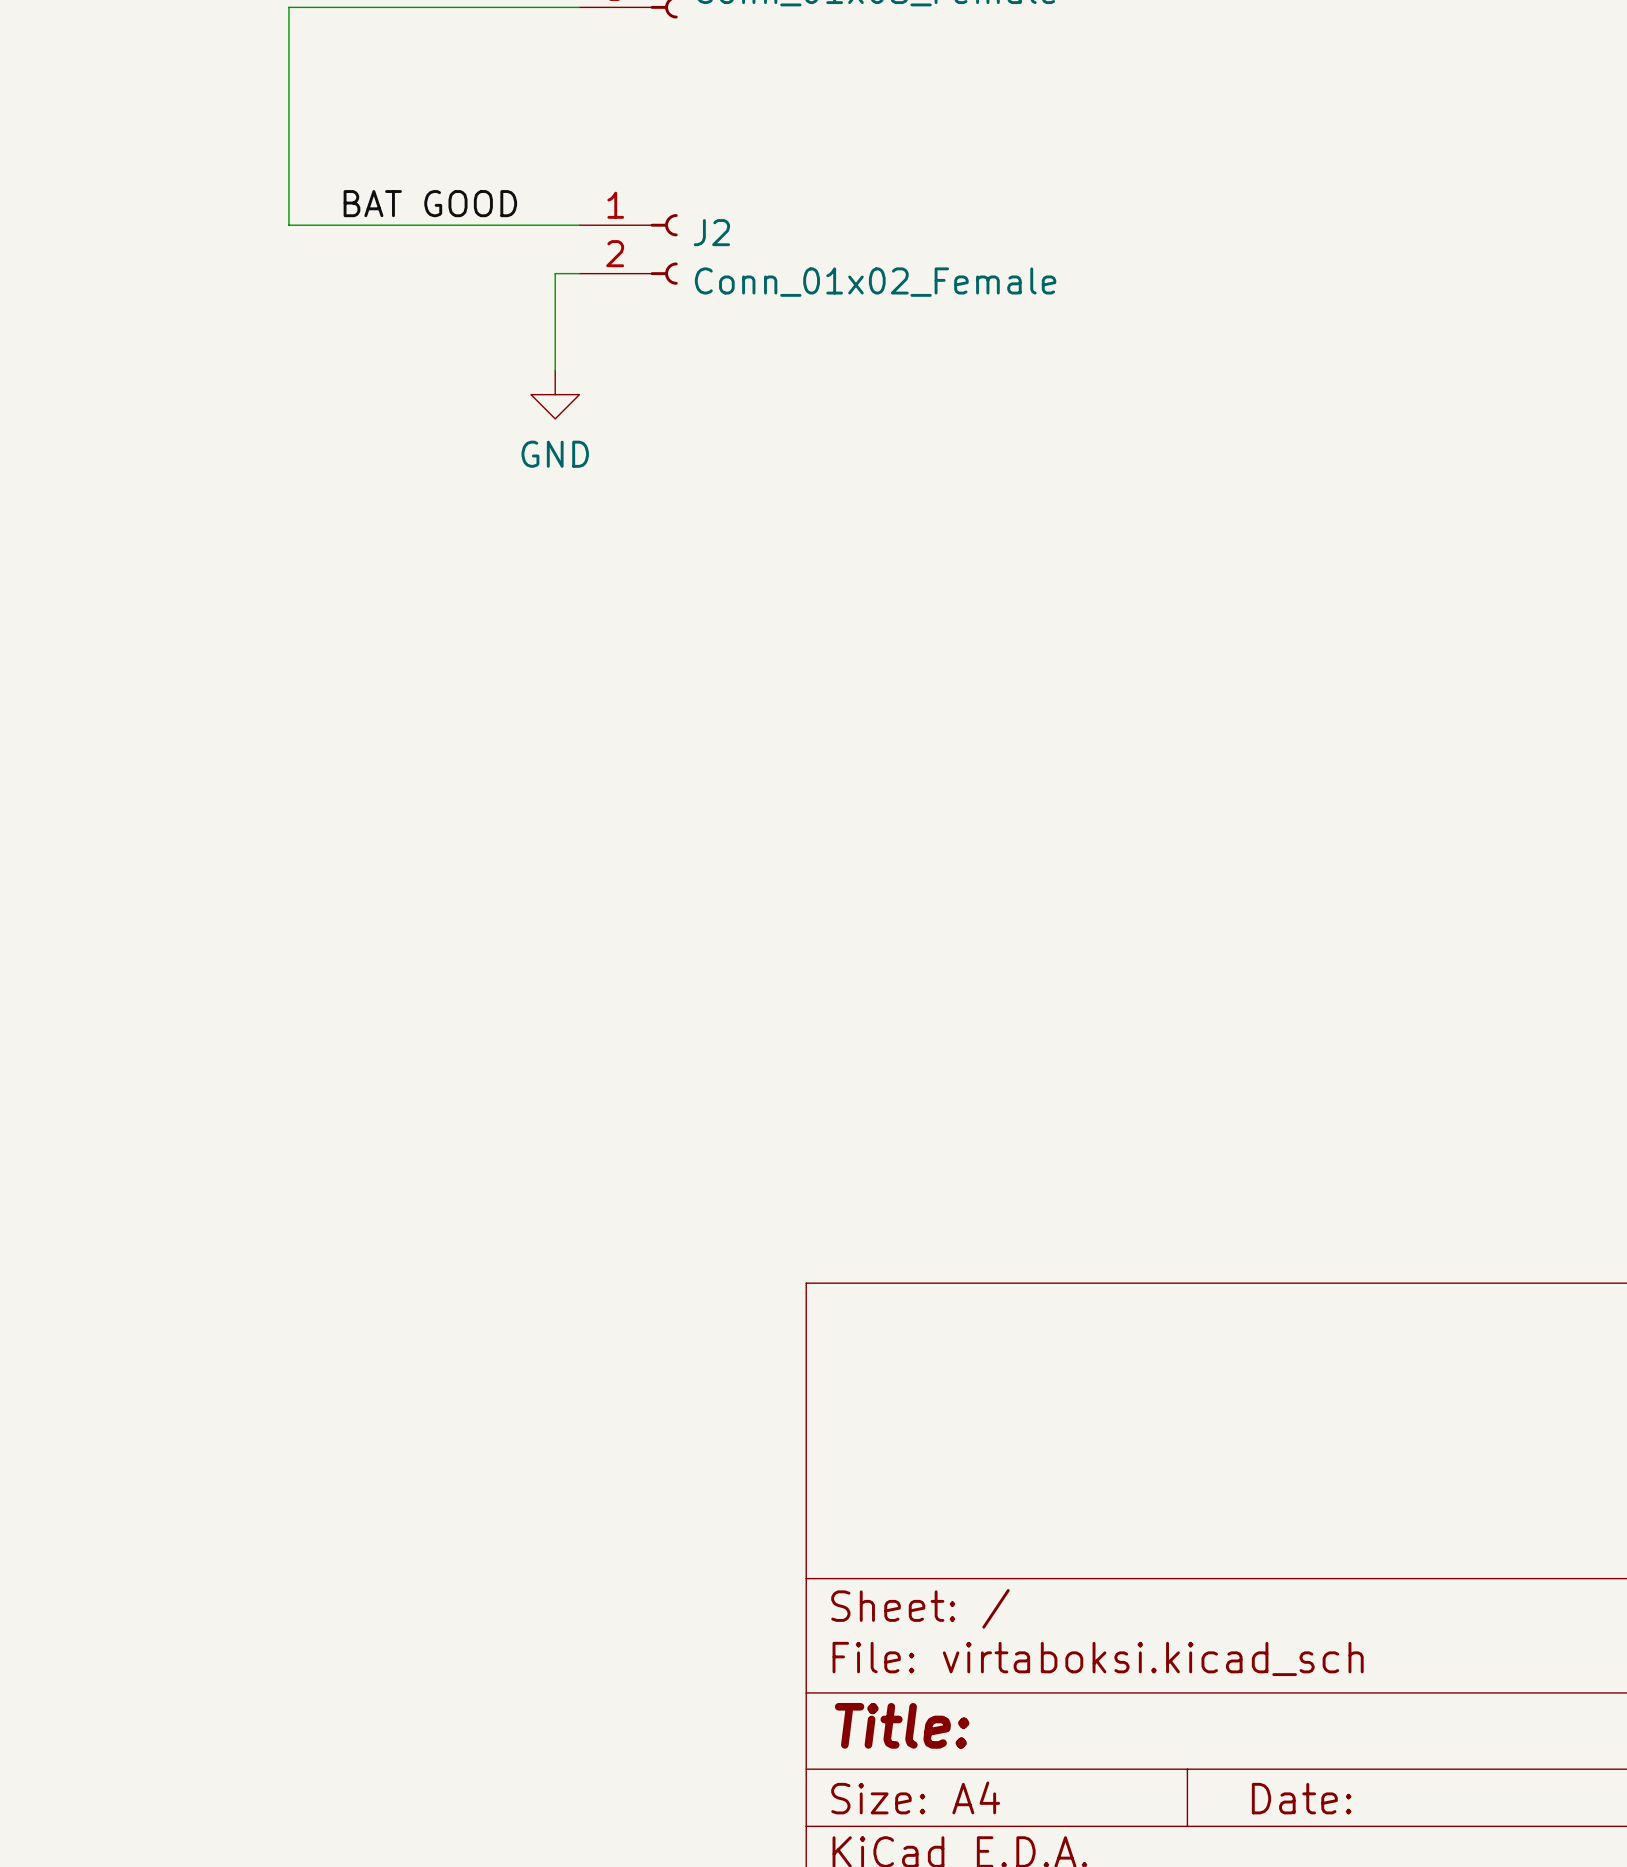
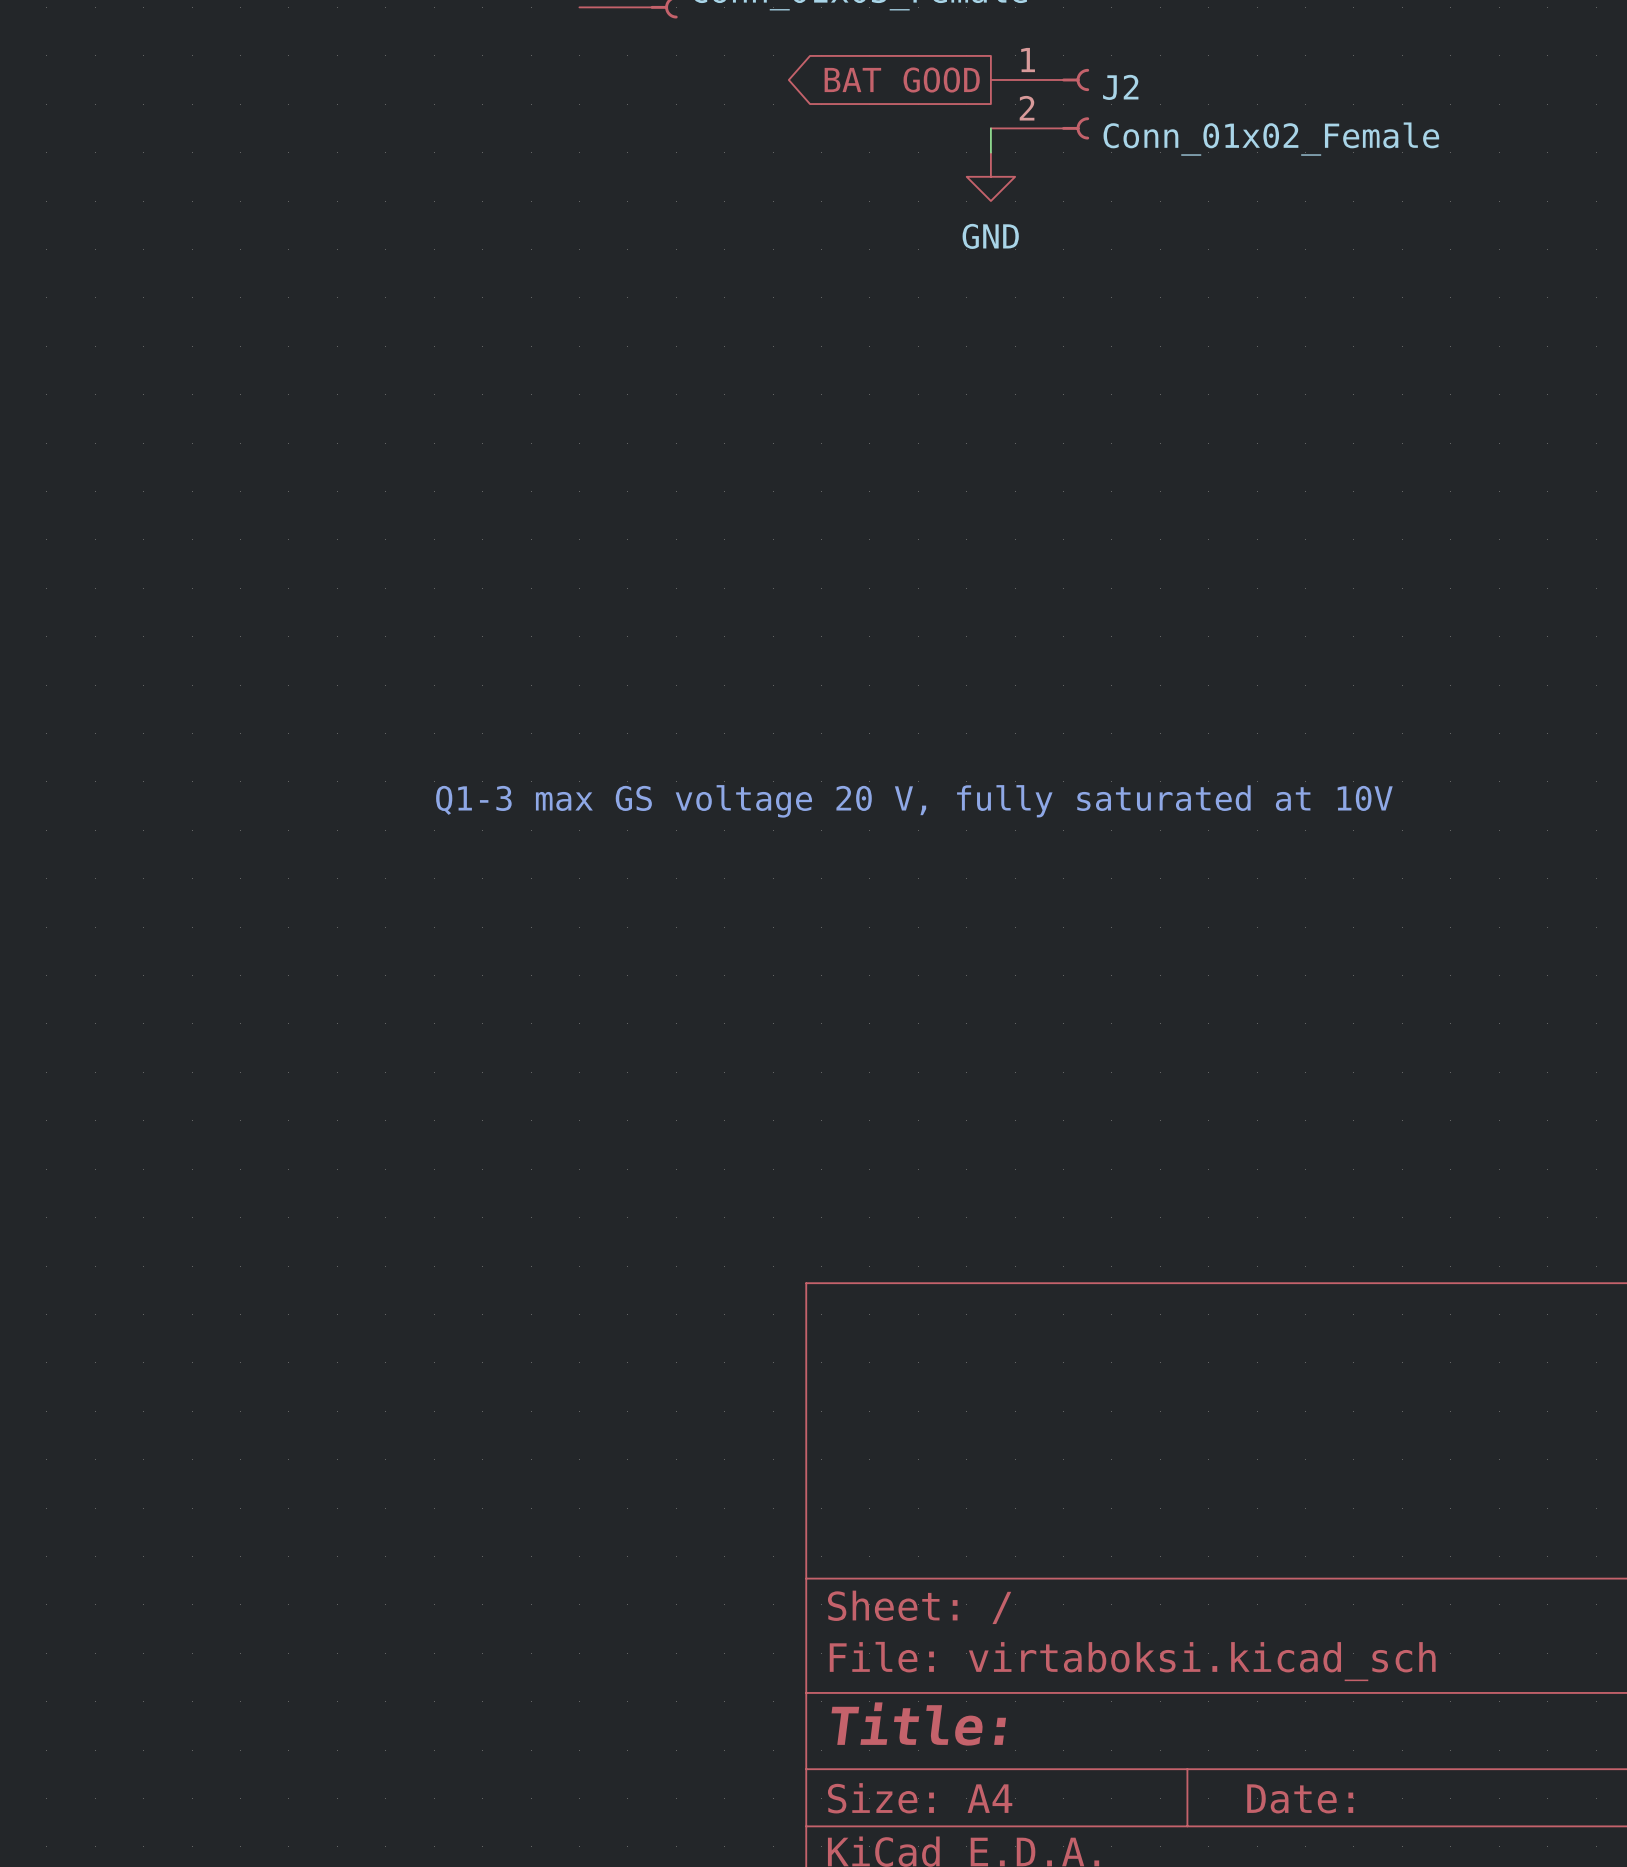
wire: (579, 7) (288, 7) (288, 225) (579, 225) -> none
global label: none -> BAT GOOD (902, 80)
wire: none -> (990, 128) (990, 152)
power symbol: none -> GND (990, 176)
label: BAT GOOD (430, 203) -> none
J2 position: (628, 249) -> (1040, 104)
wire: (579, 273) (555, 273) (555, 370) -> none
power symbol: GND (555, 394) -> none
text: none -> Q1-3 max GS voltage 20 V, fully saturated at 10V (914, 801)

